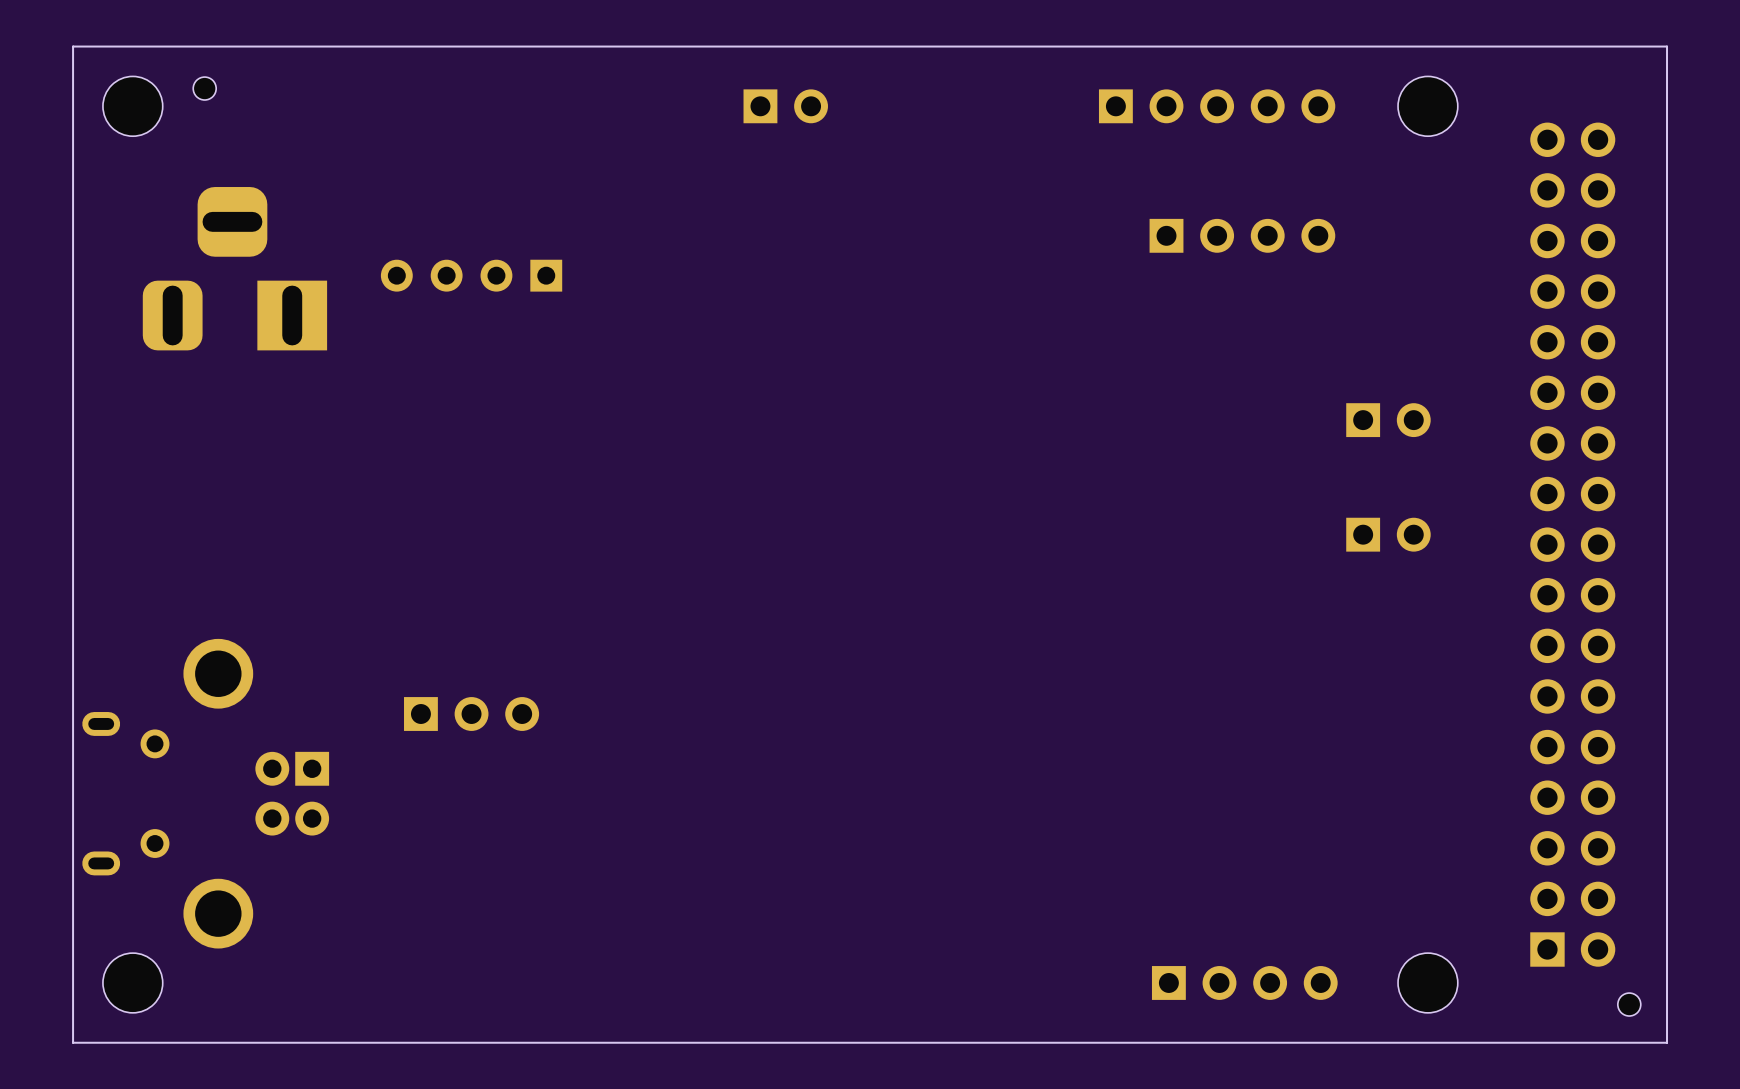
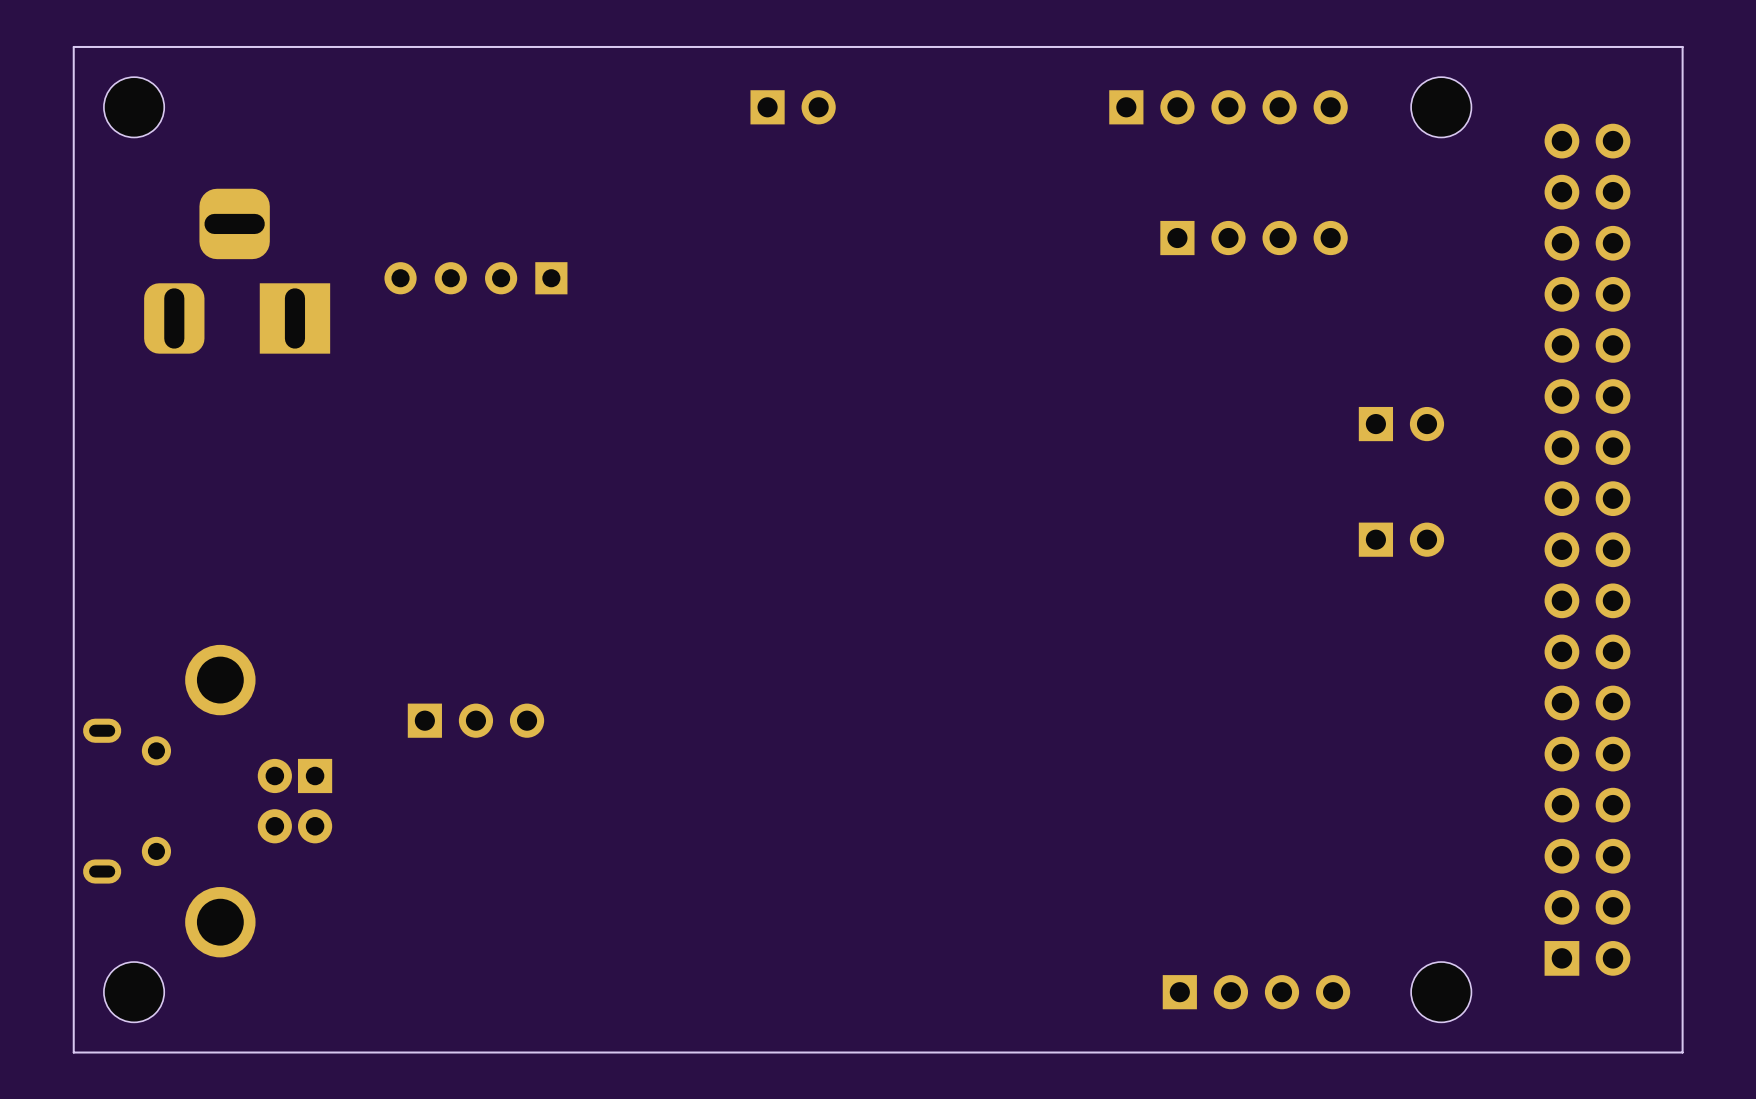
part: (204, 88) -> none
part: (1629, 1004) -> none

